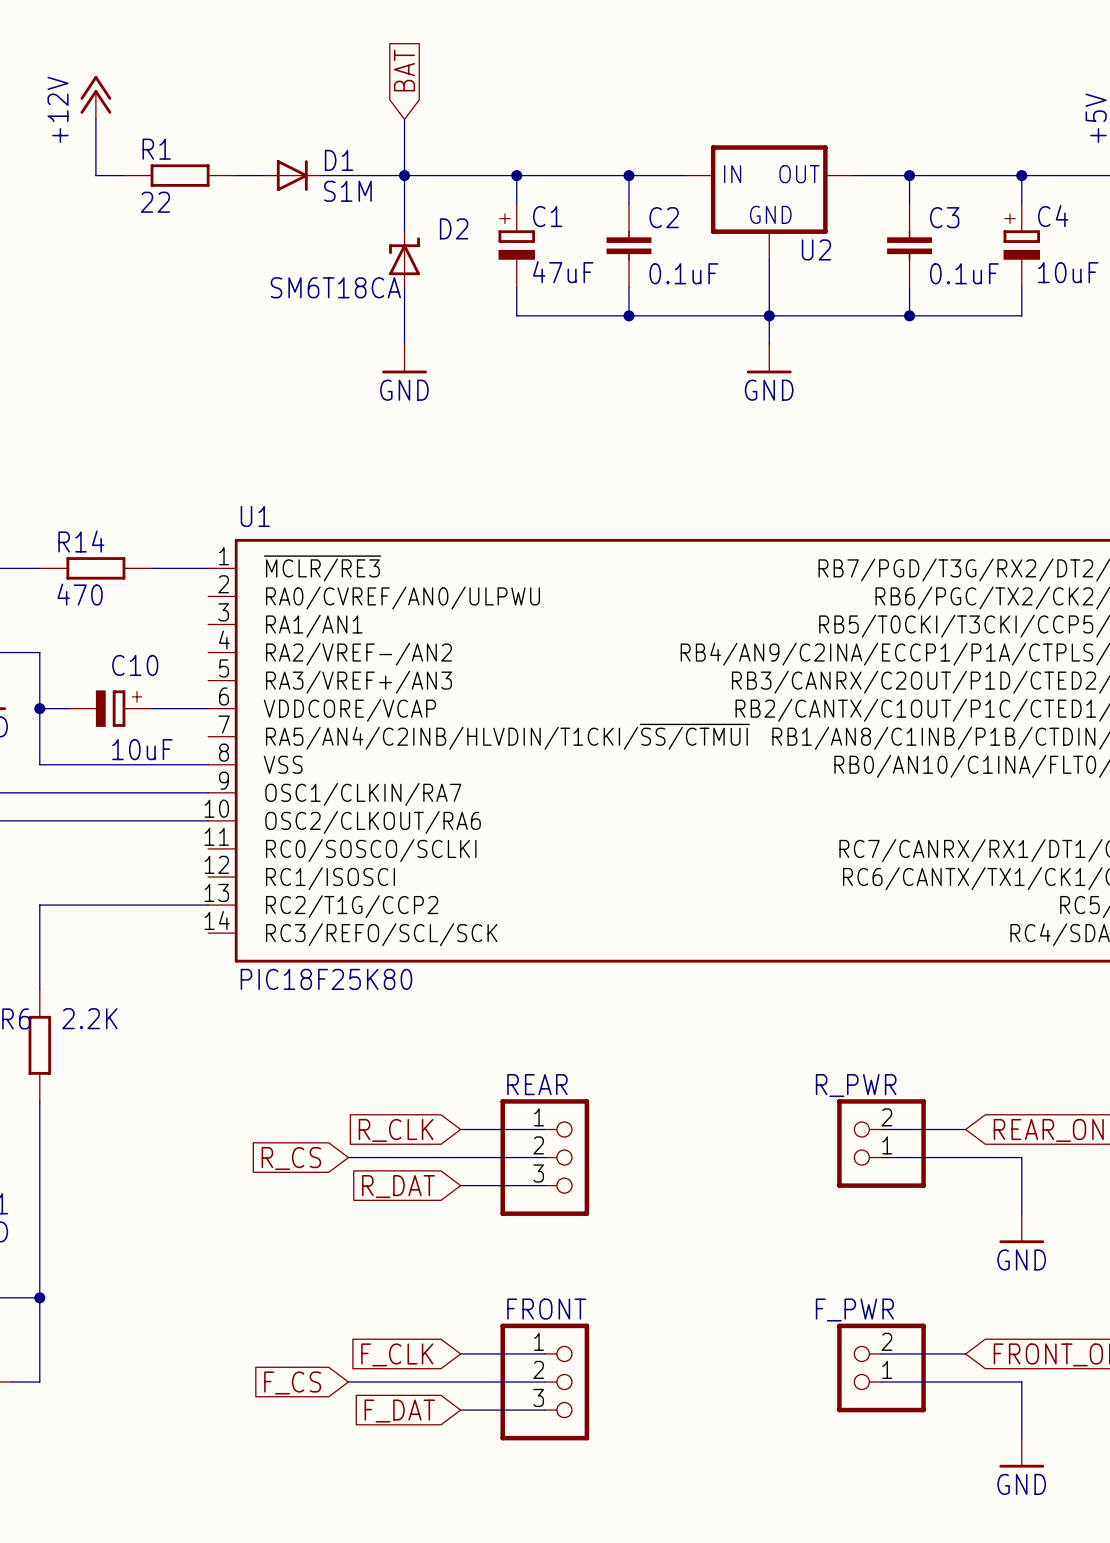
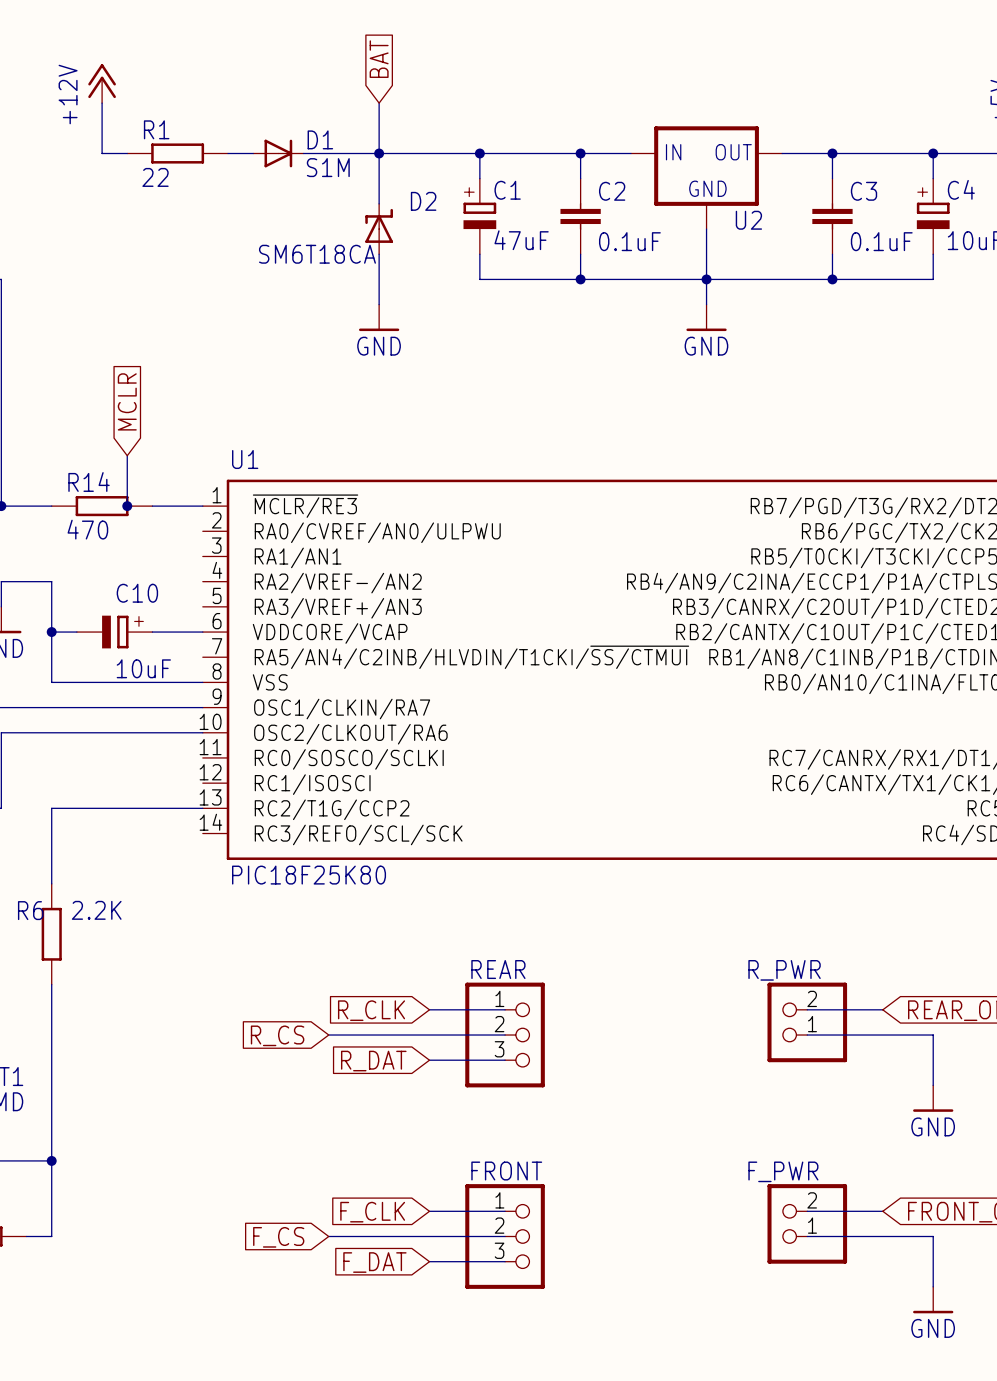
global label: none -> MCLR (127, 401)
wire: none -> (127, 455) (127, 506)
junction: none -> (127, 506)

